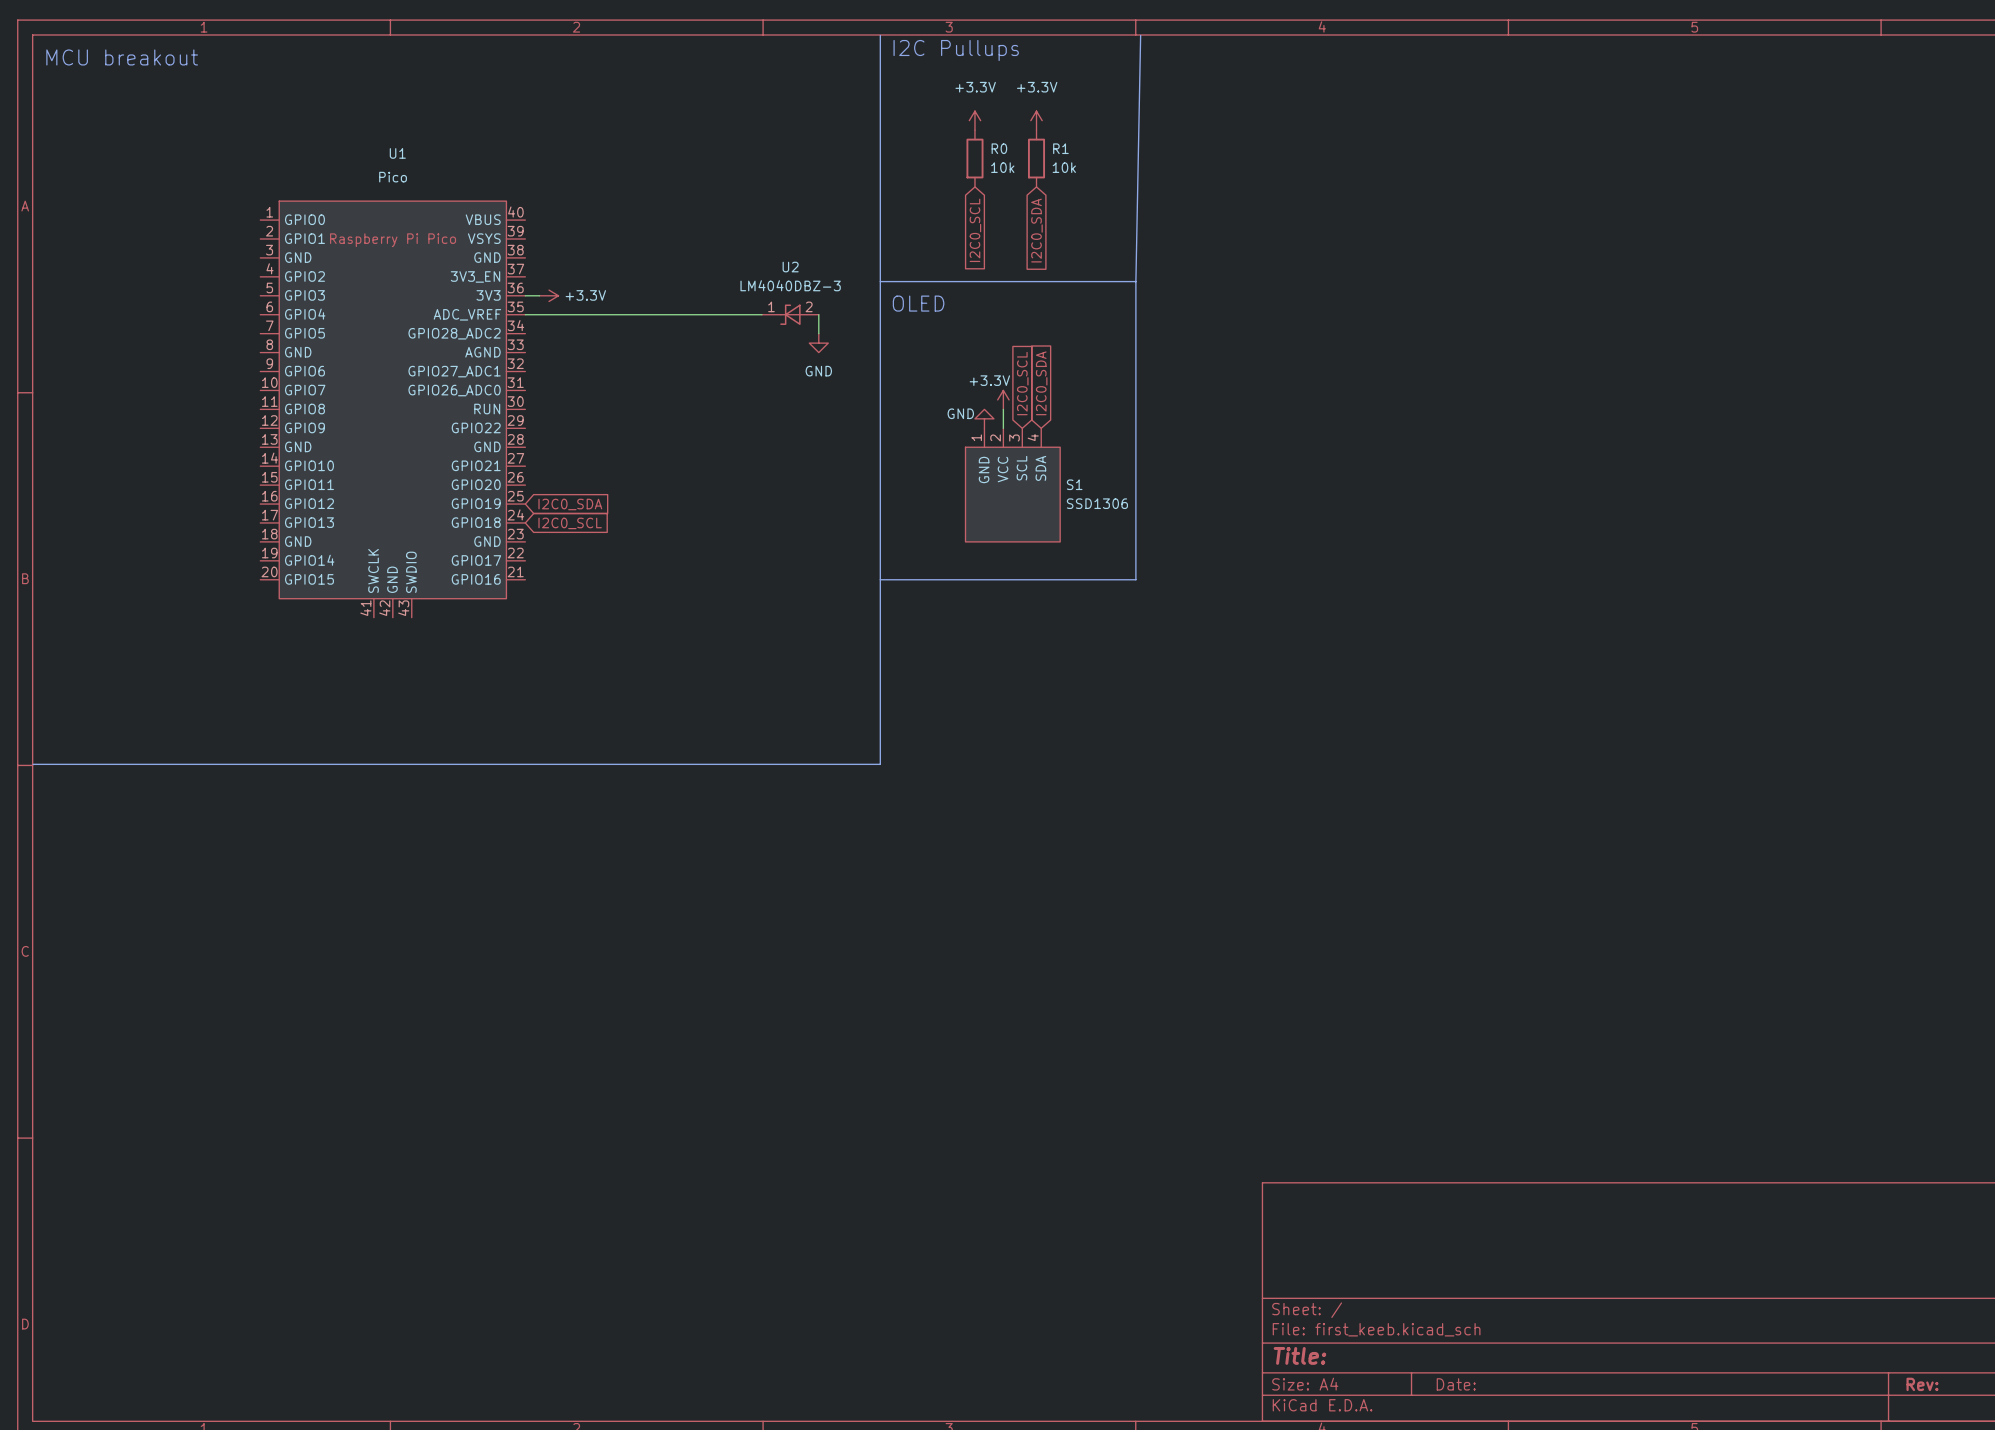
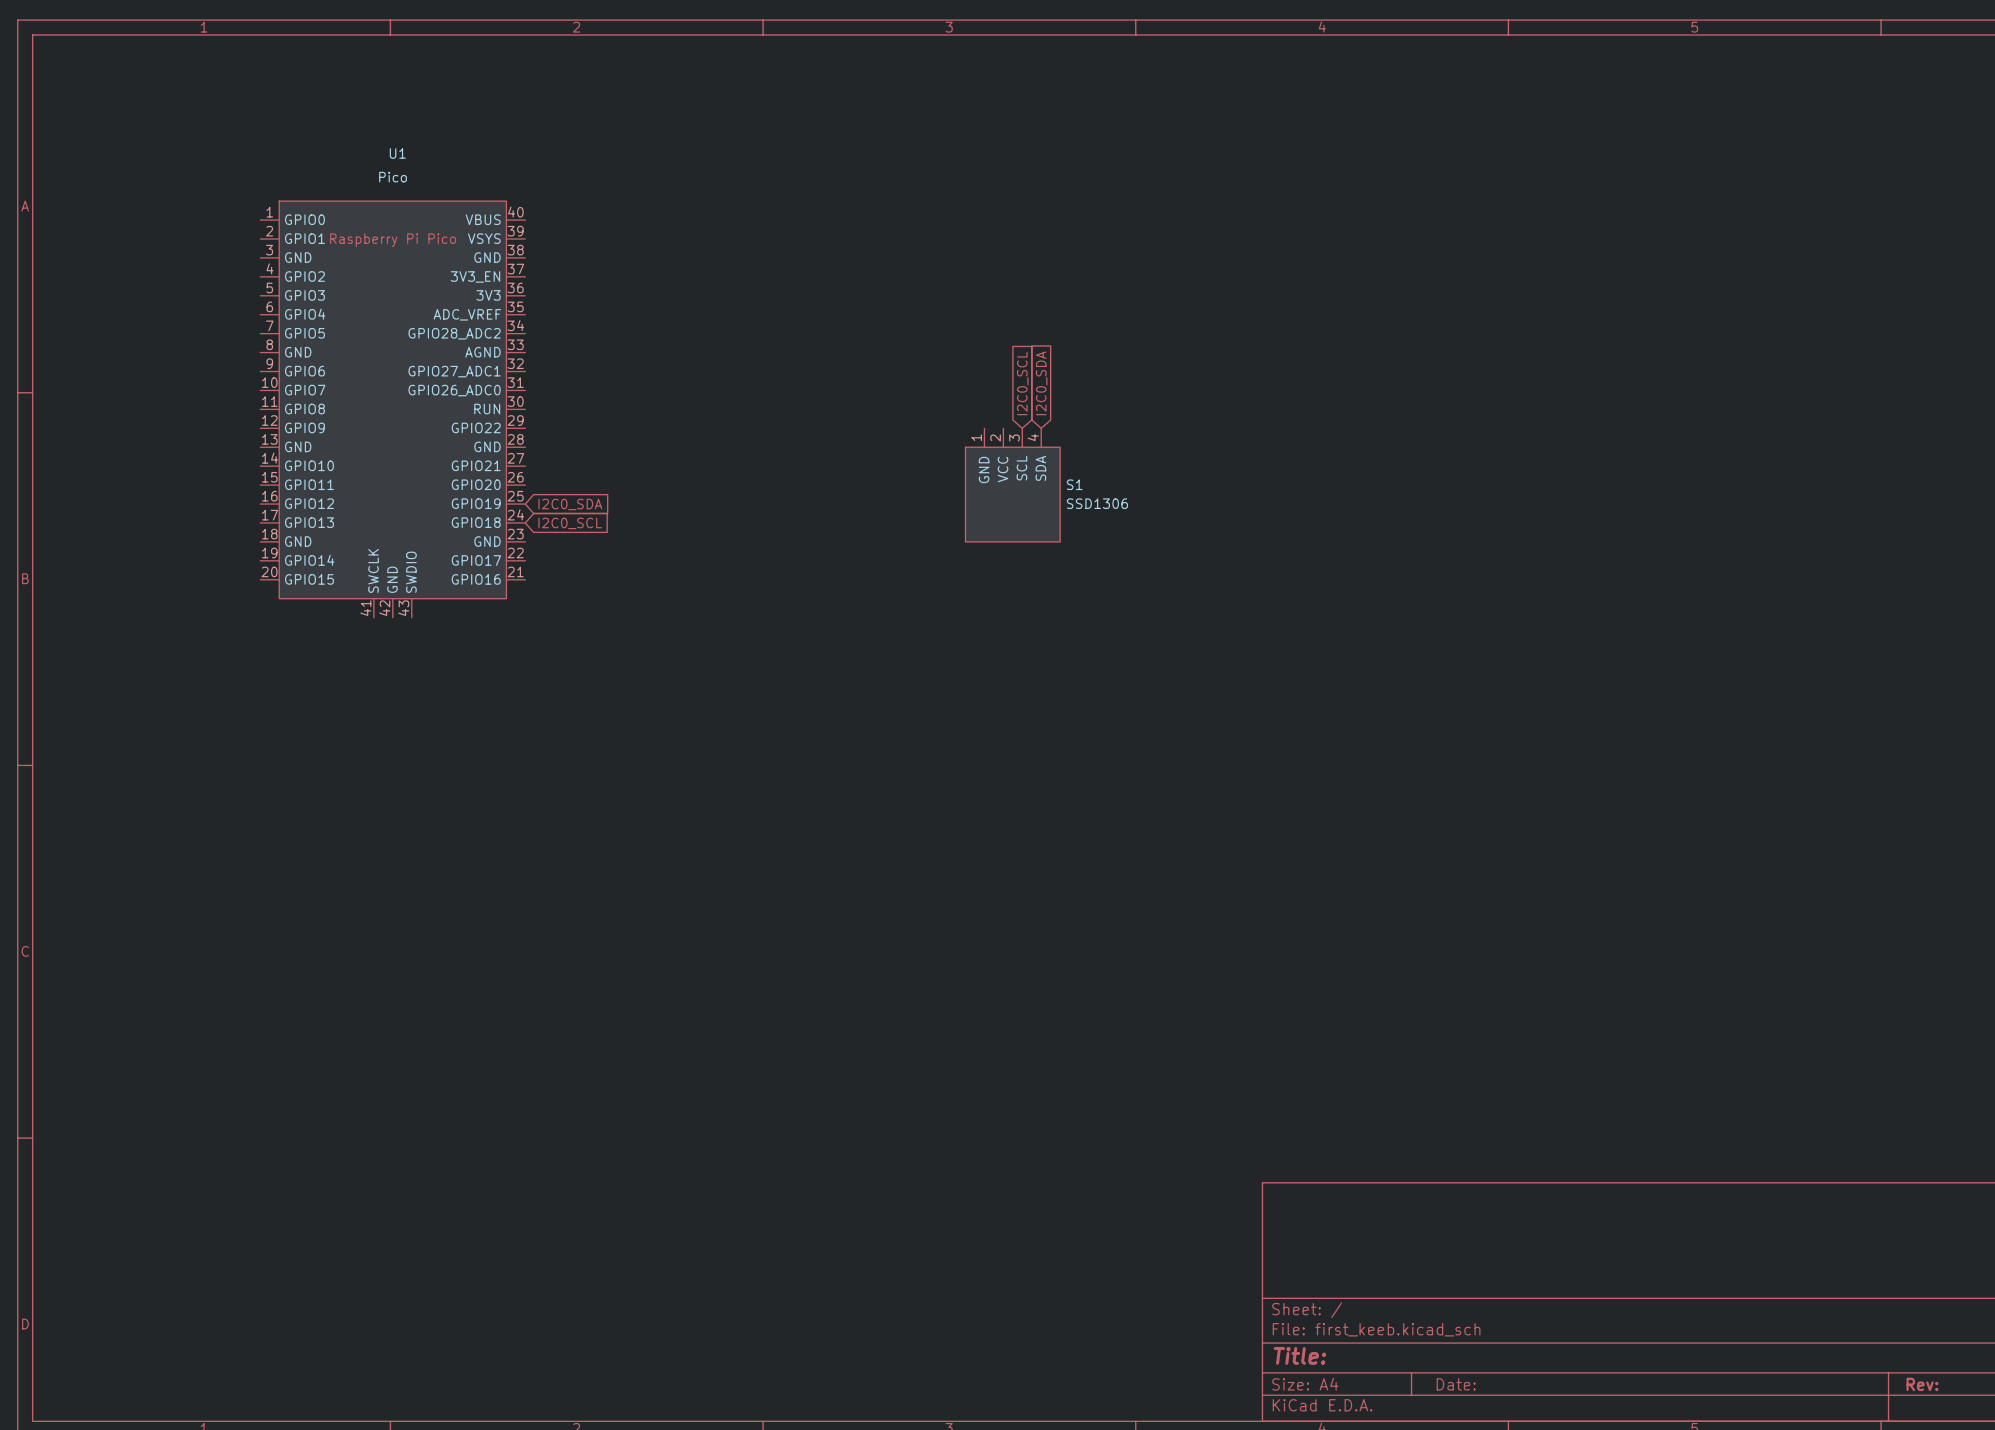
line: (880, 35) (880, 764) (33, 764) -> none
line: (1140, 35) (1135, 281) -> none
text: I2C Pullups (956, 50) -> none
text: MCU breakout (122, 57) -> none
power symbol: +3.3V (974, 120) -> none
power symbol: +3.3V (1036, 120) -> none
R0: 10k (974, 158) -> none
R1: 10k (1036, 158) -> none
global label: I2C0_SCL (975, 230) -> none
global label: I2C0_SDA (1036, 230) -> none
line: (880, 281) (1135, 281) -> none
line: (1135, 281) (1135, 579) (880, 579) -> none
wire: (525, 295) (539, 295) -> none
power symbol: +3.3V (549, 295) -> none
text: OLED (918, 303) -> none
wire: (525, 314) (762, 314) -> none
U2: LM4040DBZ-3 (790, 314) -> none
wire: (818, 314) (818, 333) -> none
power symbol: GND (818, 343) -> none
power symbol: +3.3V (1003, 399) -> none
wire: (1003, 409) (1003, 428) -> none
power symbol: GND (984, 418) -> none

